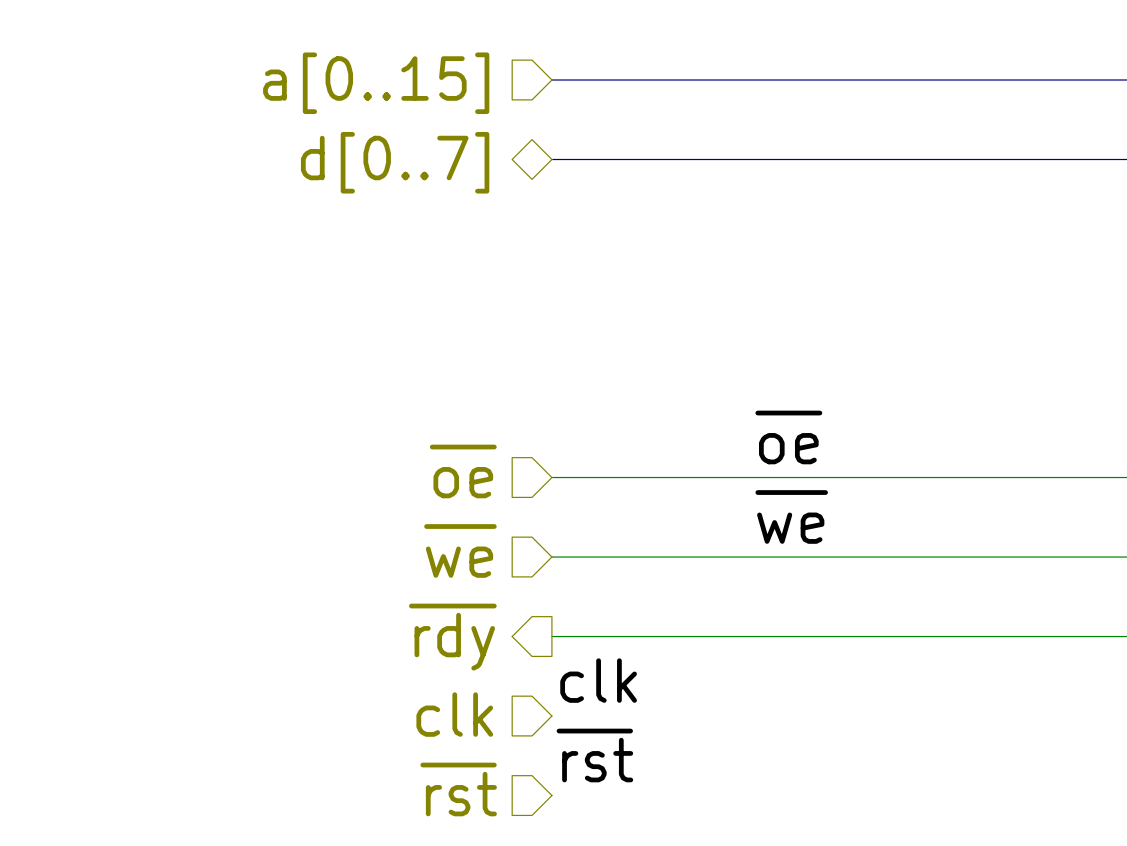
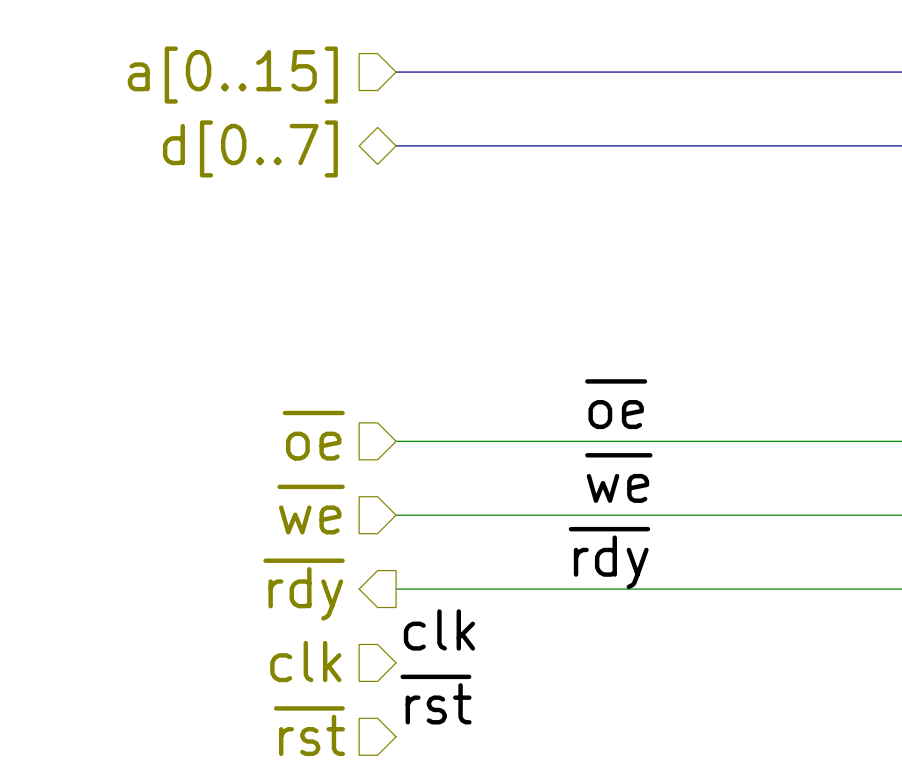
label: none -> ~{rdy} (609, 558)

